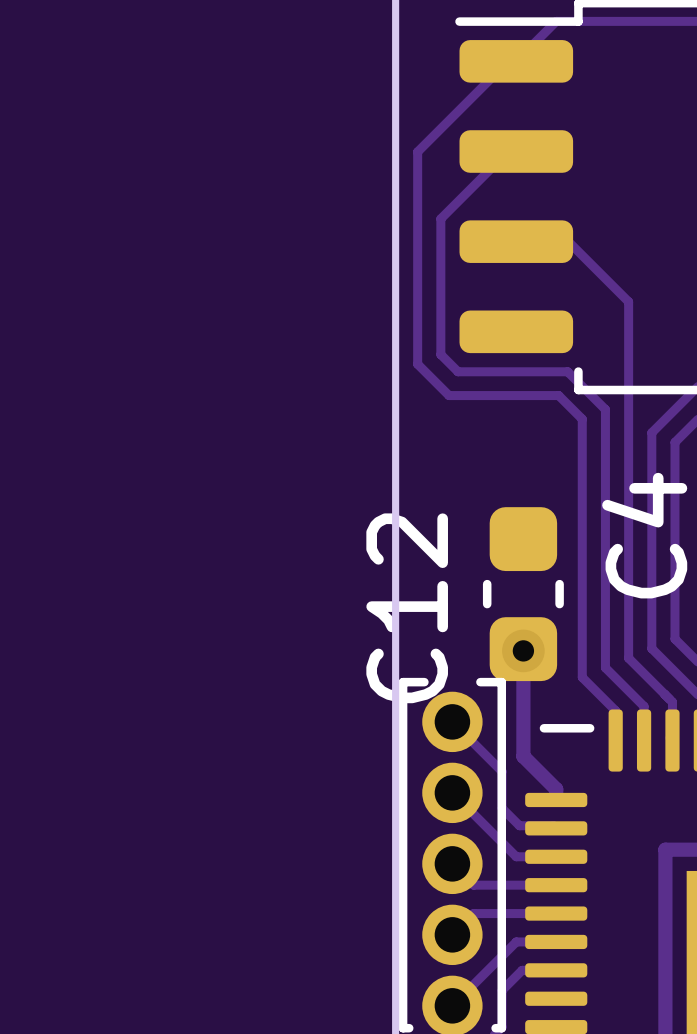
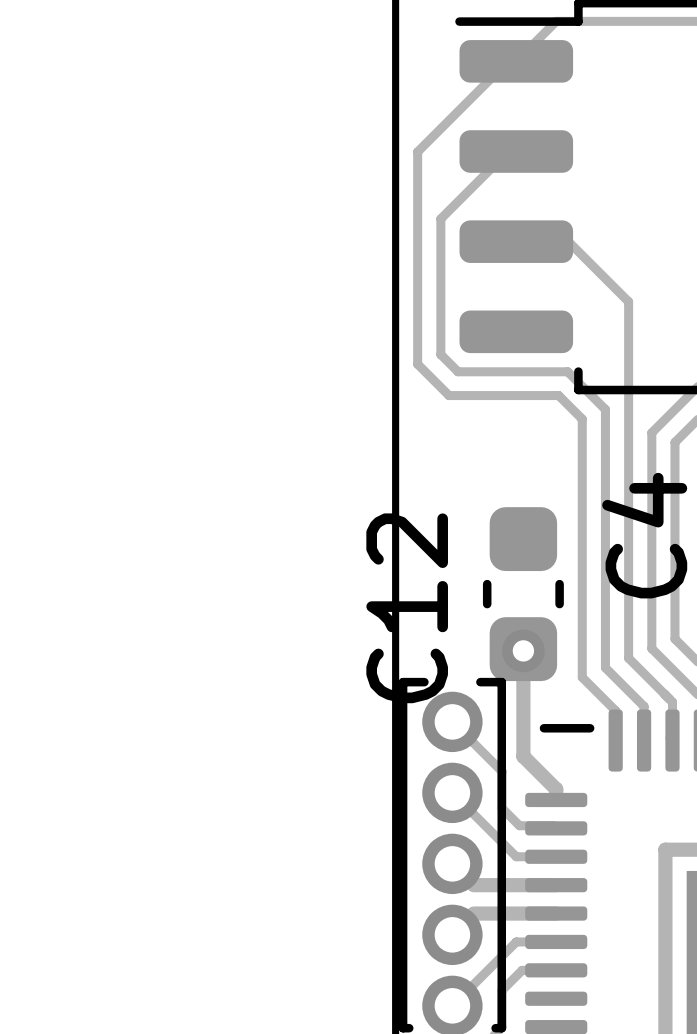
track width: thin (473, 885) (556, 885) -> thick (473, 885) (556, 885)
track width: thin (473, 913) (556, 913) -> thick (473, 913) (556, 913)

